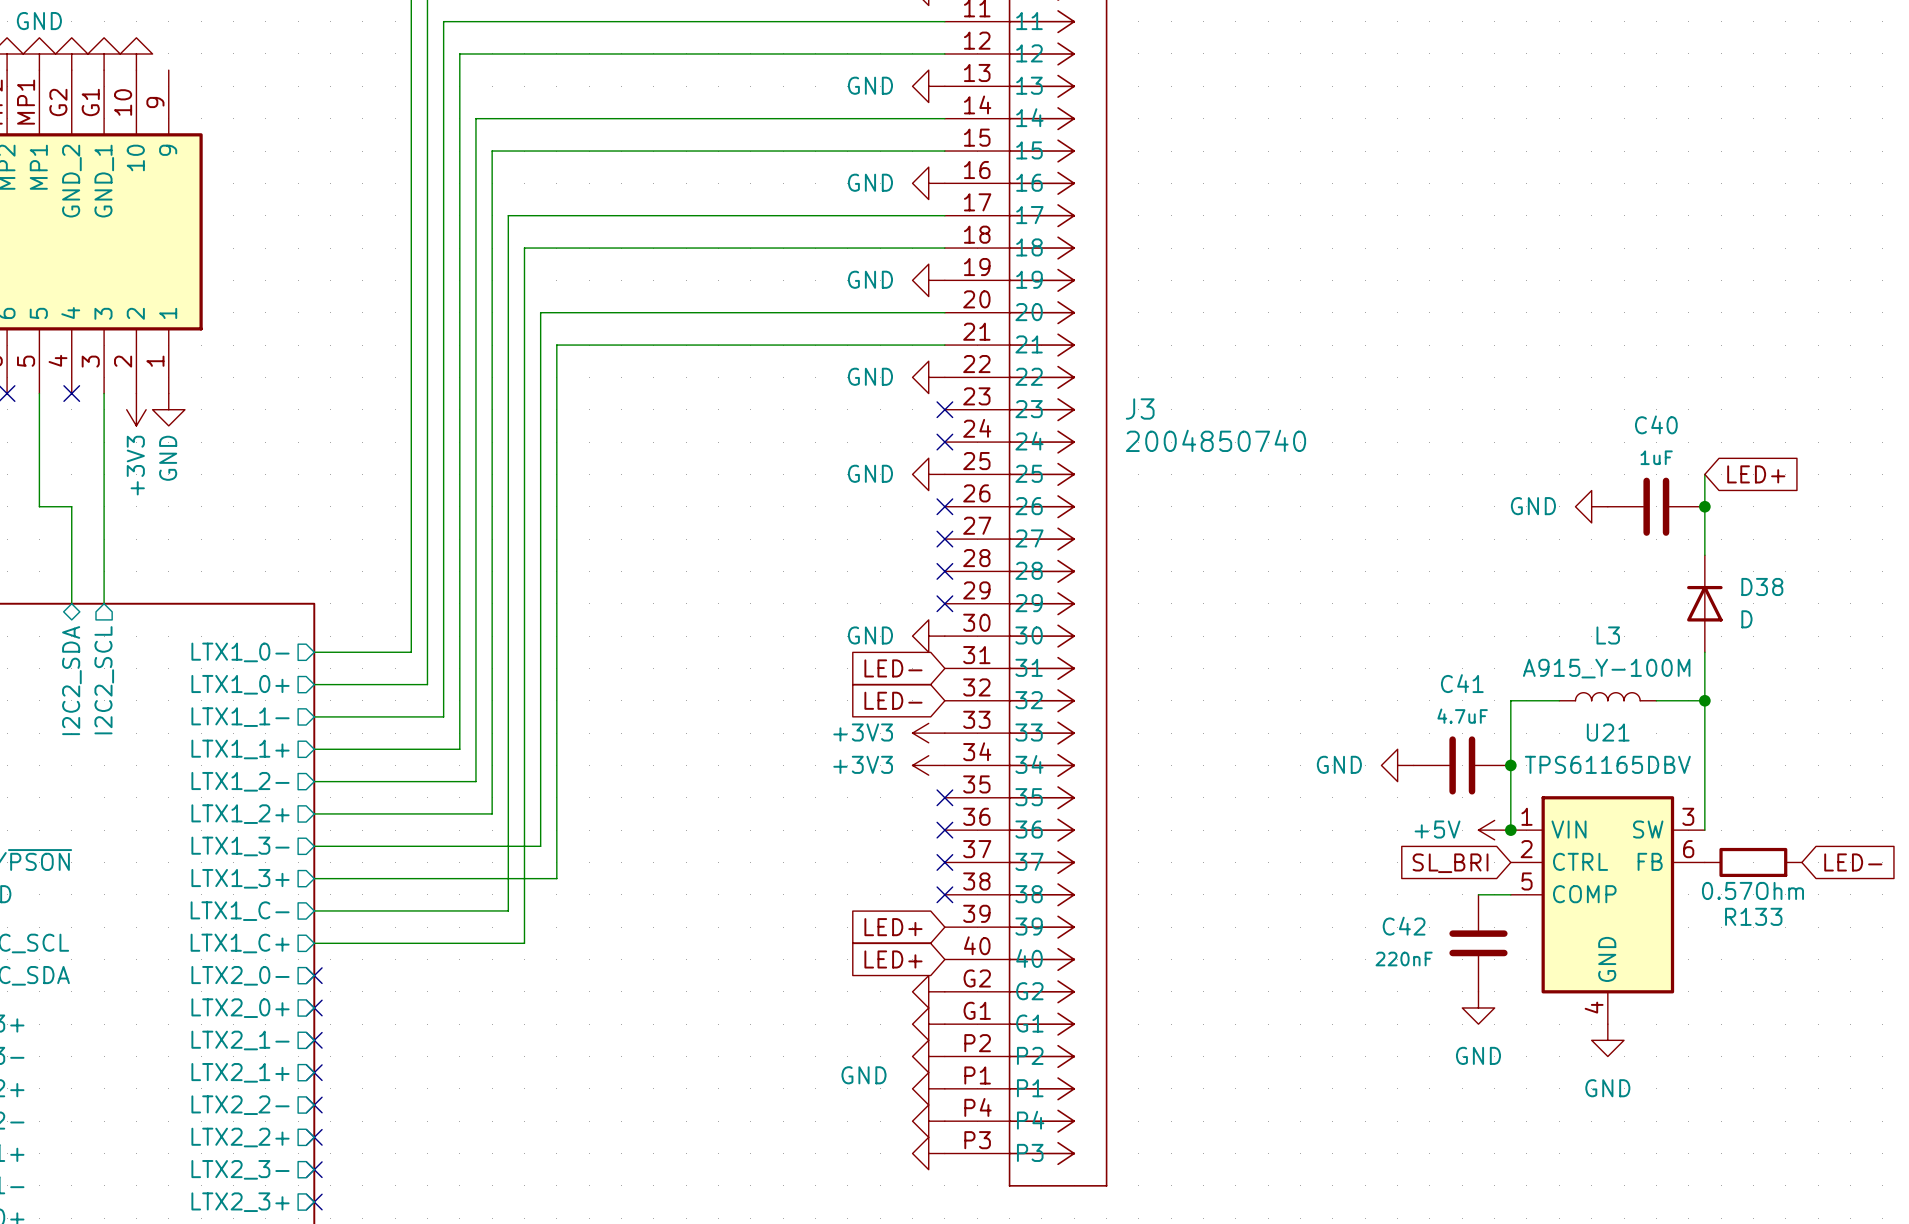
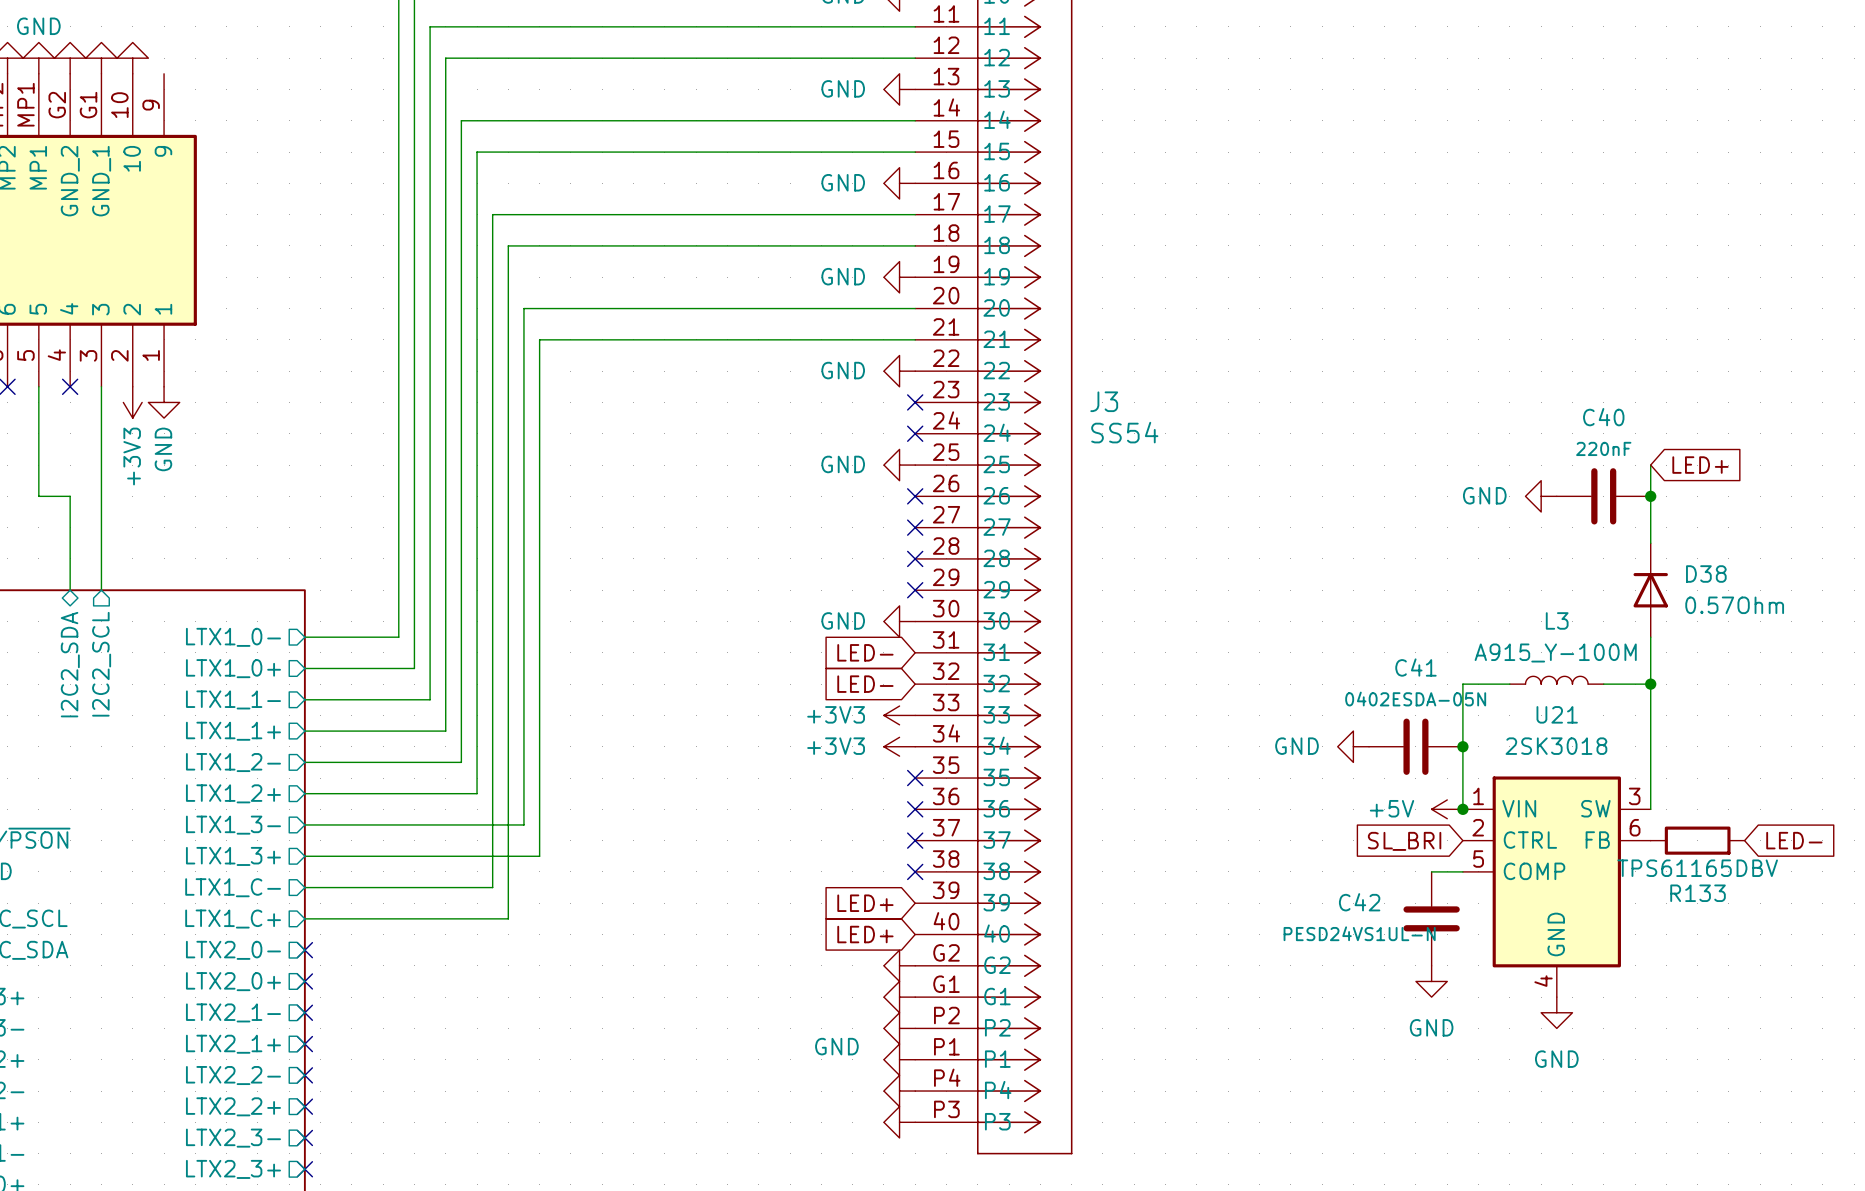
J3 value: 2004850740 (1215, 440) -> SS54 (1124, 432)
C40 value: 1uF (1656, 457) -> 220nF (1603, 448)
D38 value: D (1746, 619) -> 0.57Ohm (1734, 605)
C41 value: 4.7uF (1462, 716) -> 0402ESDA-05N (1415, 699)
U21 value: TPS61165DBV (1607, 764) -> 2SK3018 (1556, 746)
R133 value: 0.57Ohm (1752, 890) -> TPS61165DBV (1697, 868)
C42 value: 220nF (1404, 959) -> PESD24VS1UL-N (1359, 933)

